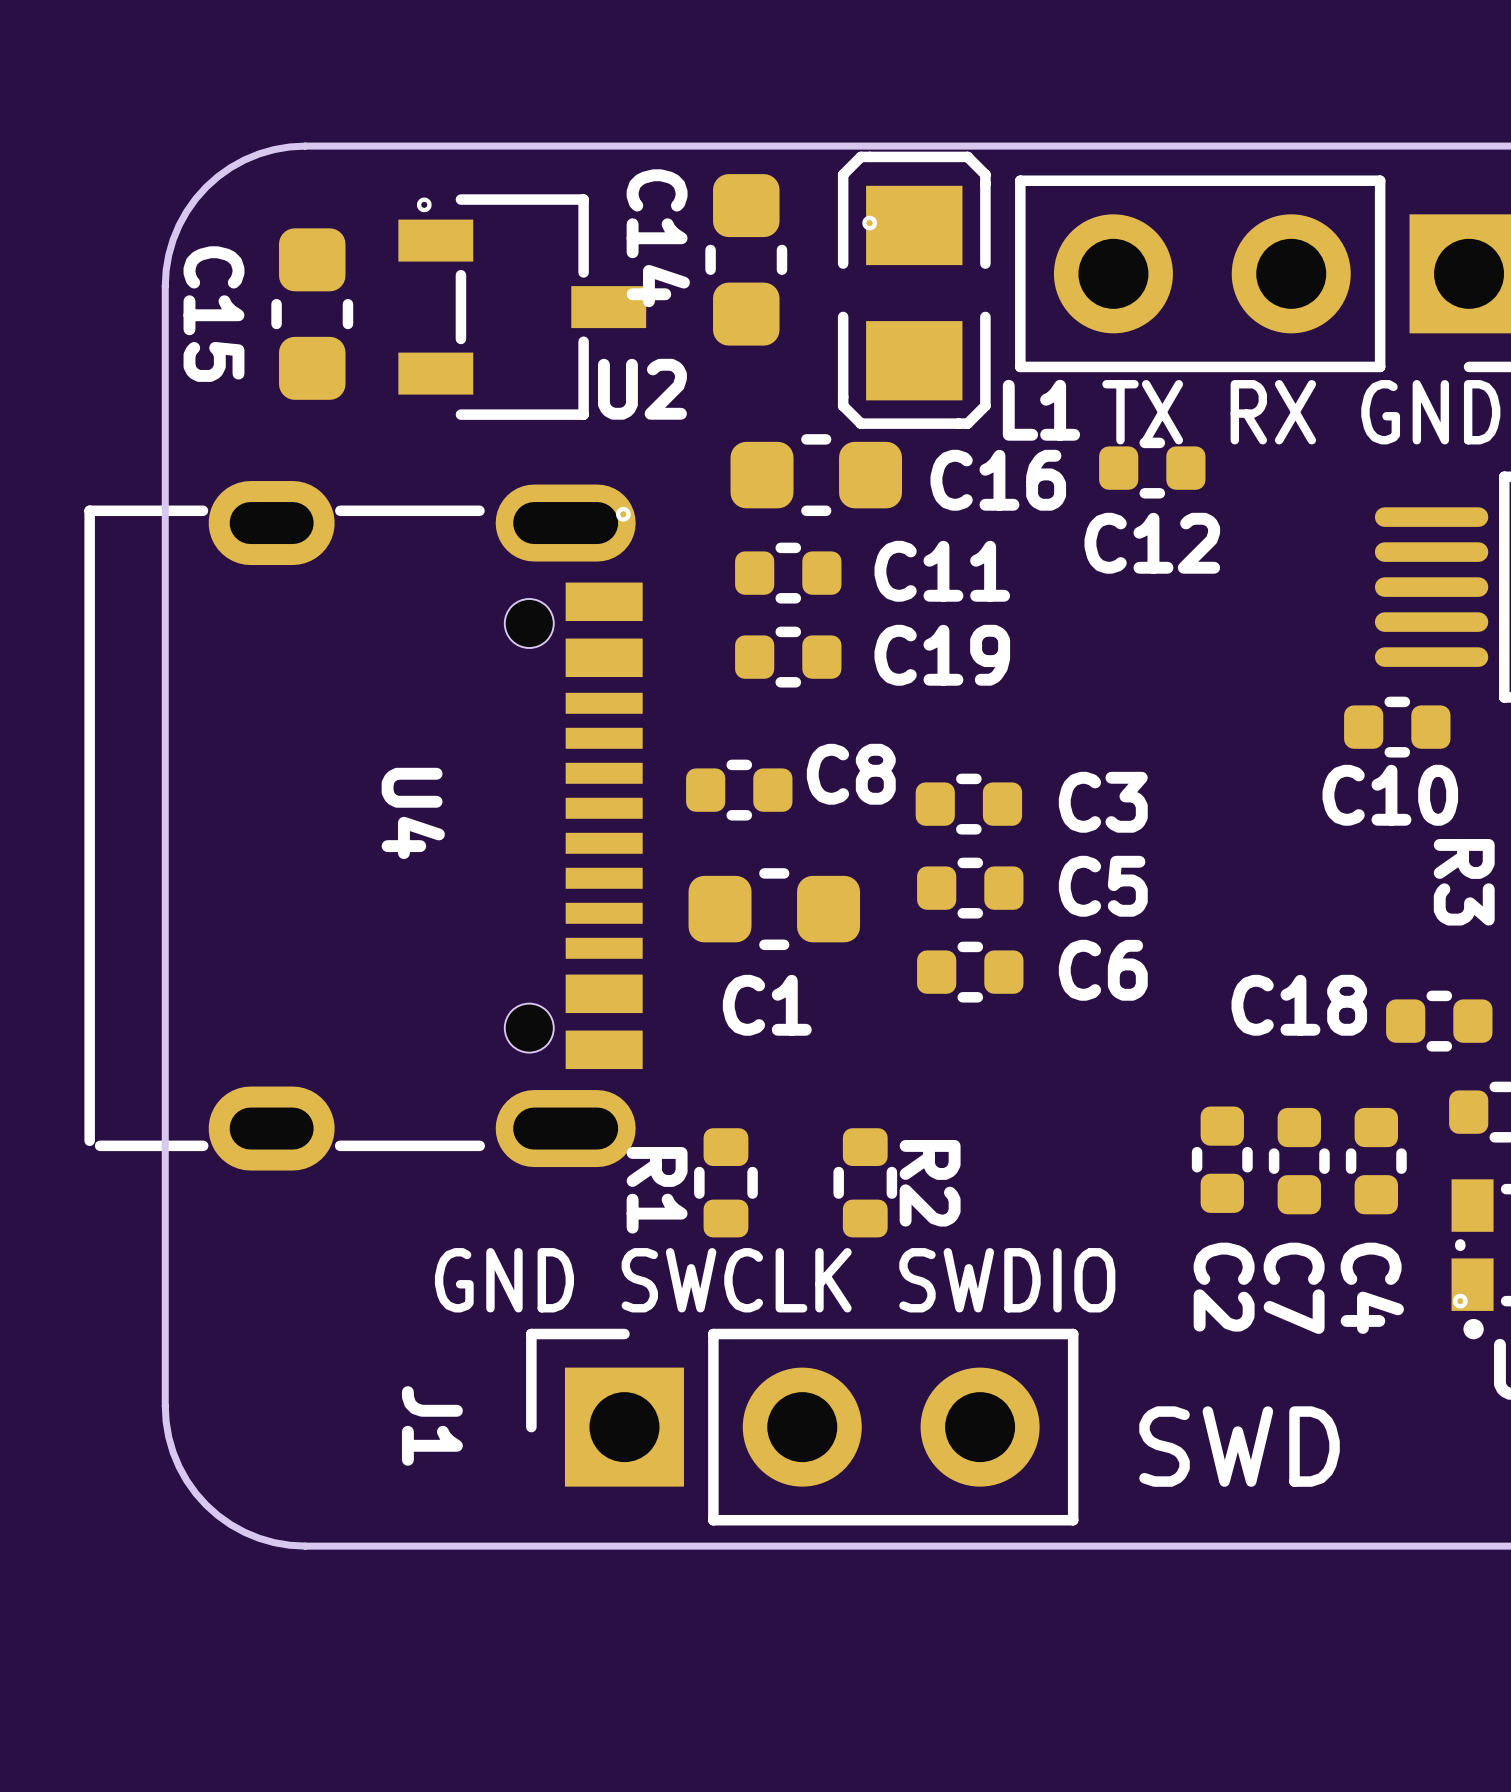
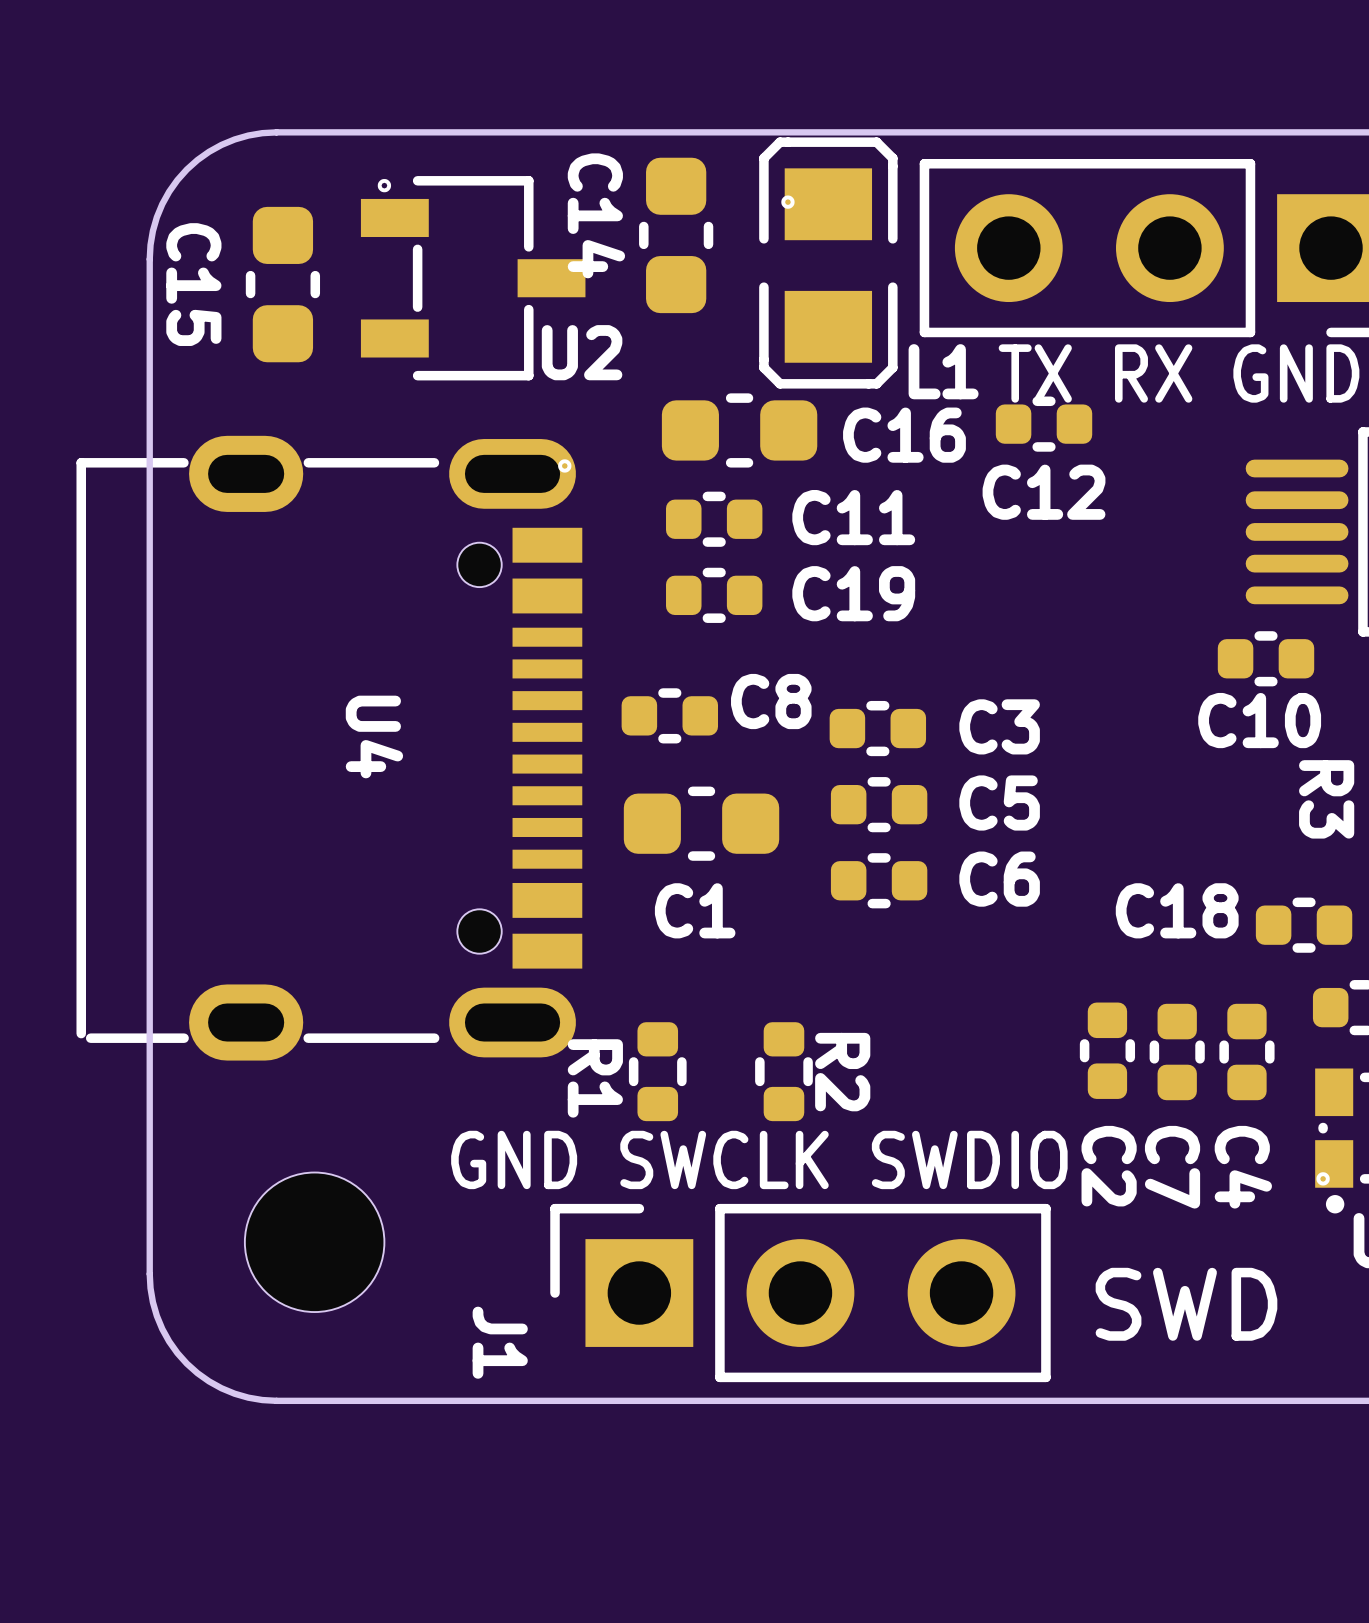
text position: GND SWCLK SWDIO (775, 1280) -> GND SWCLK SWDIO (759, 1159)
part: none -> (314, 1242)
J1 name position: J1 (432, 1425) -> J1 (500, 1342)
J1 position: (802, 1427) -> (800, 1293)
text position: SWD (1239, 1446) -> SWD (1186, 1304)

